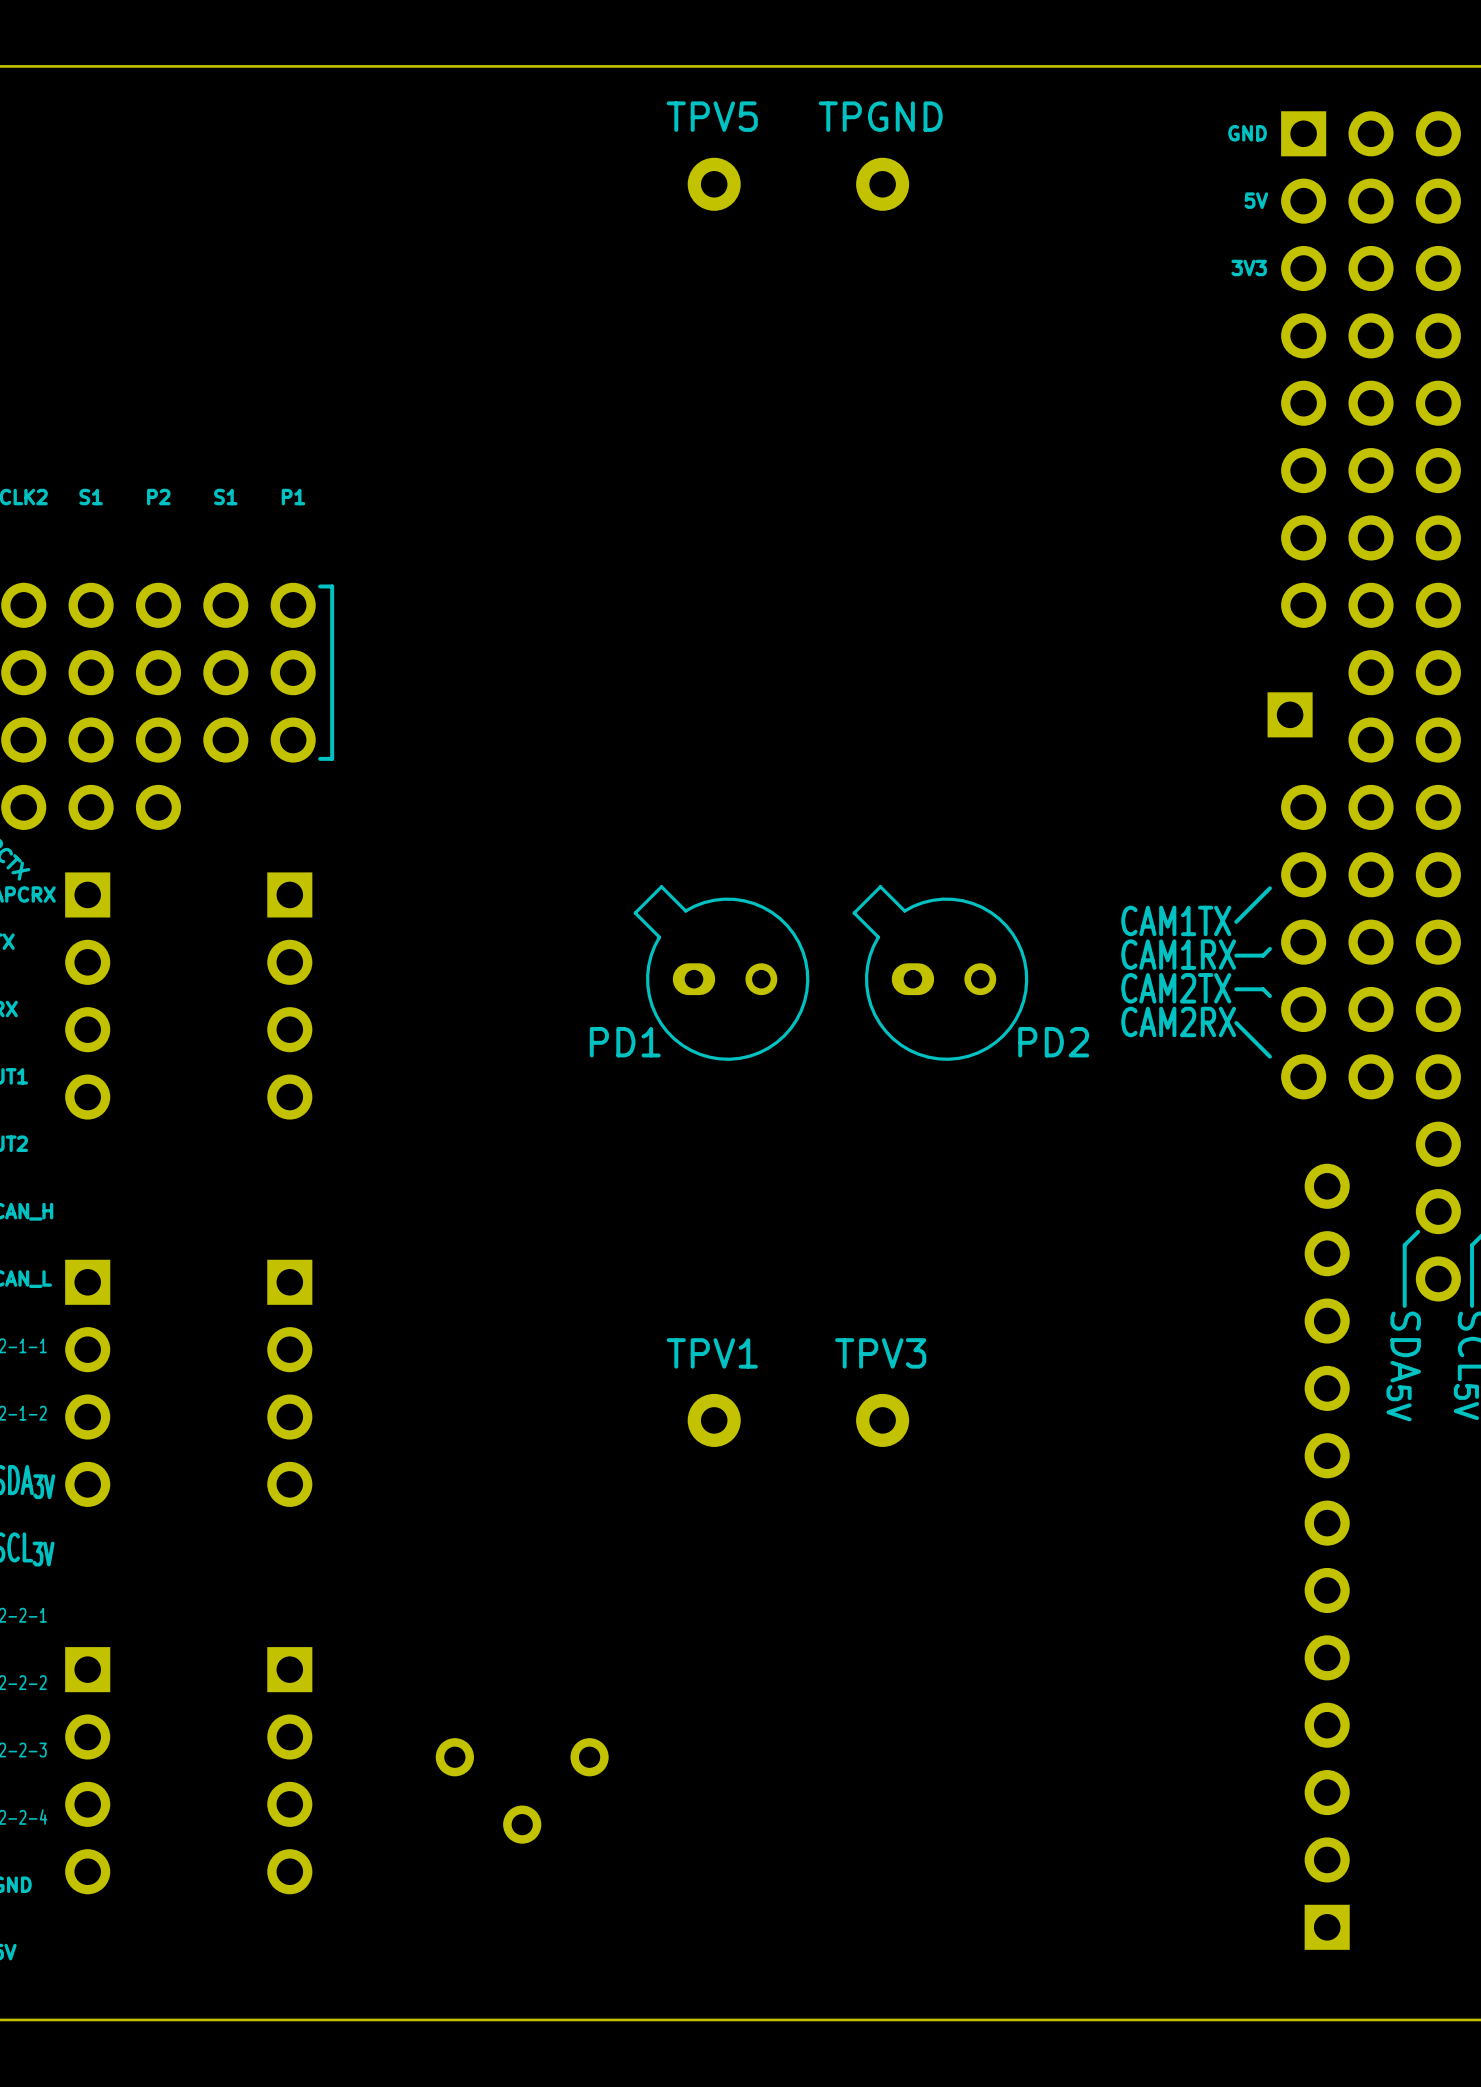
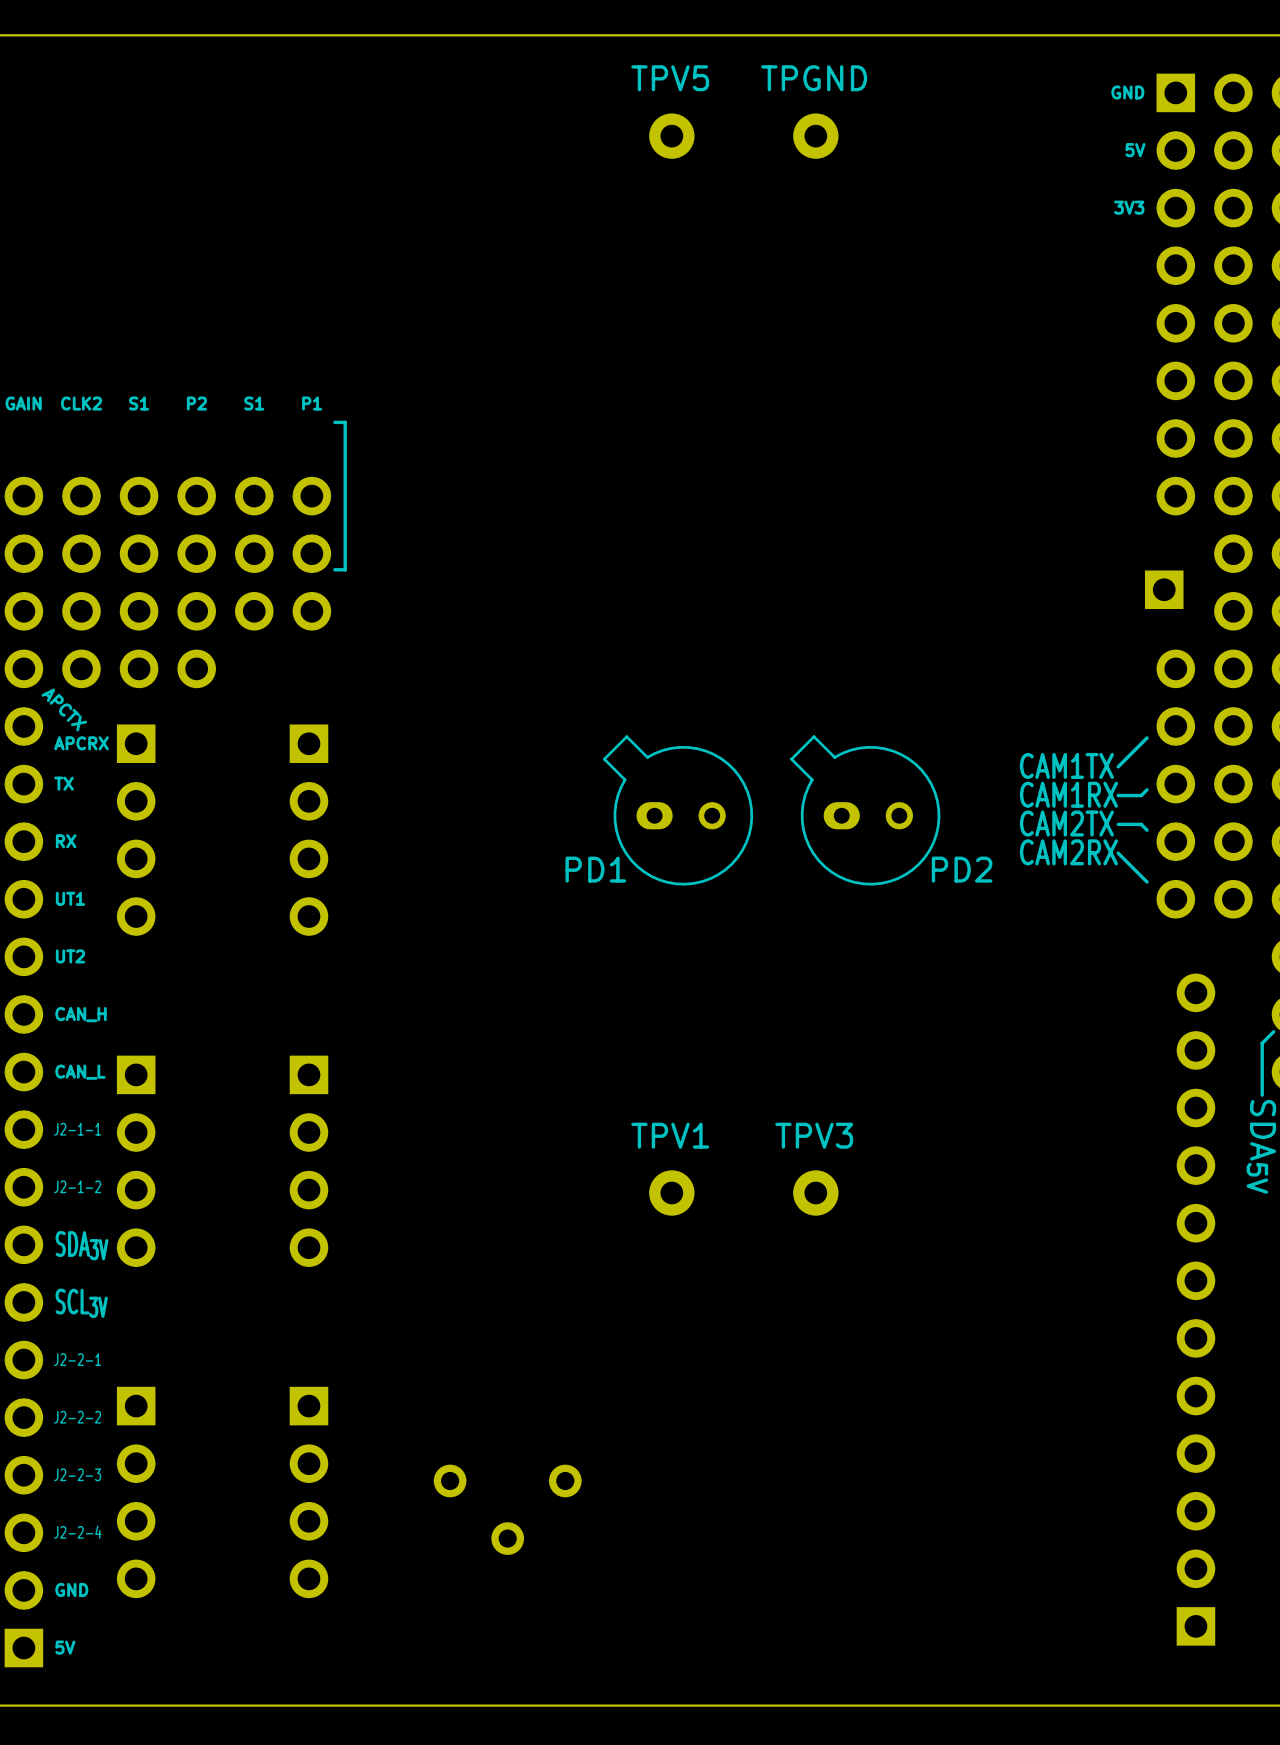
line: (332, 586) (320, 586) -> (345, 479) (345, 422) (334, 422)
line: (332, 691) (332, 758) (320, 758) -> (345, 569) (334, 569)

